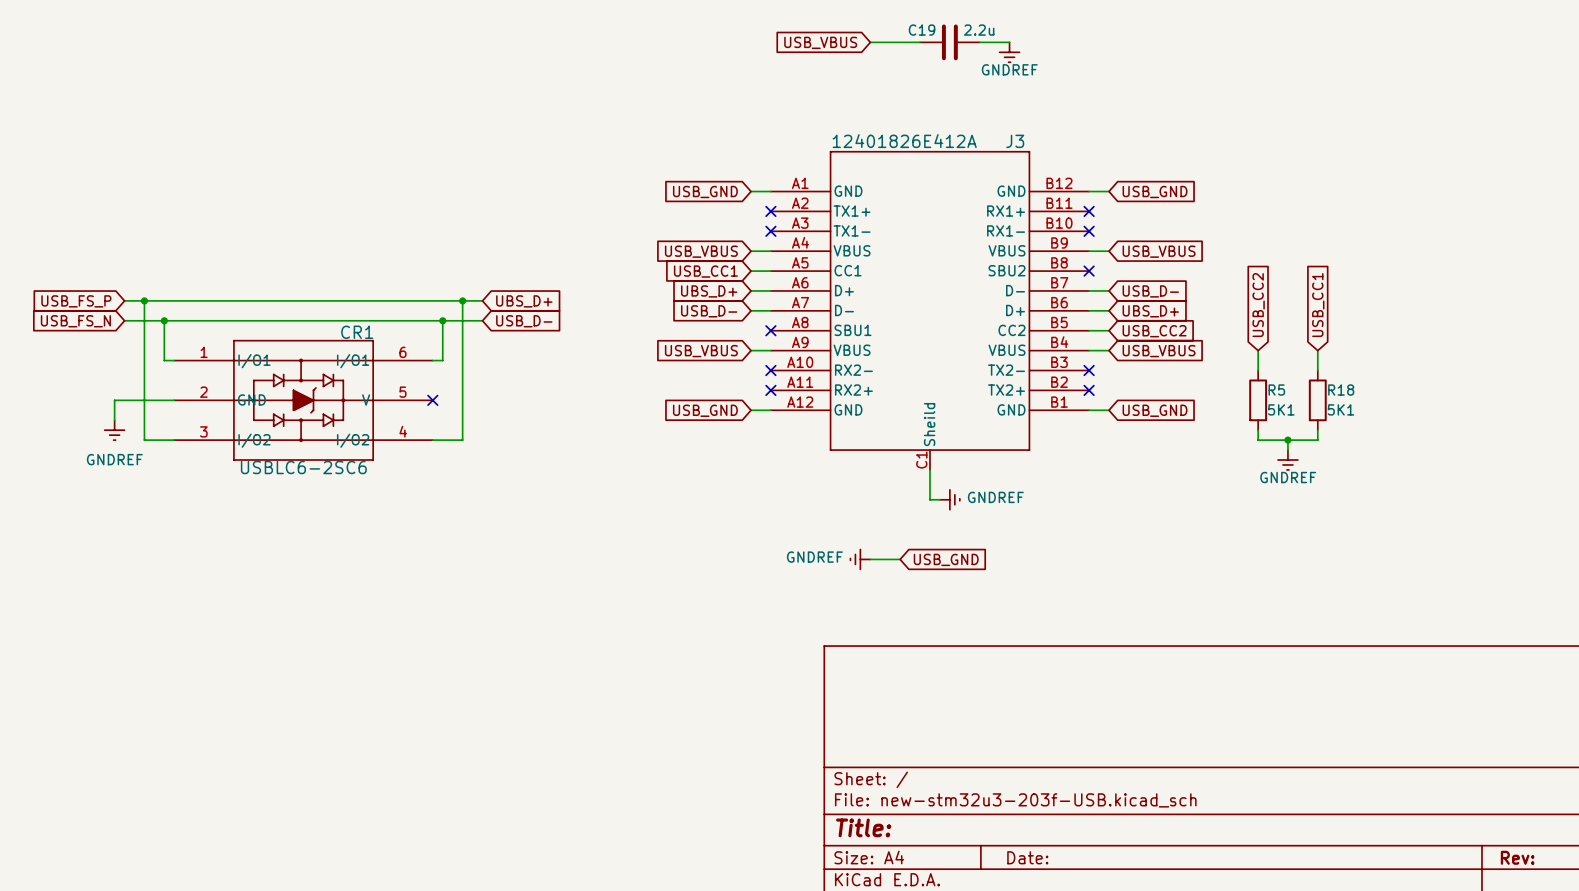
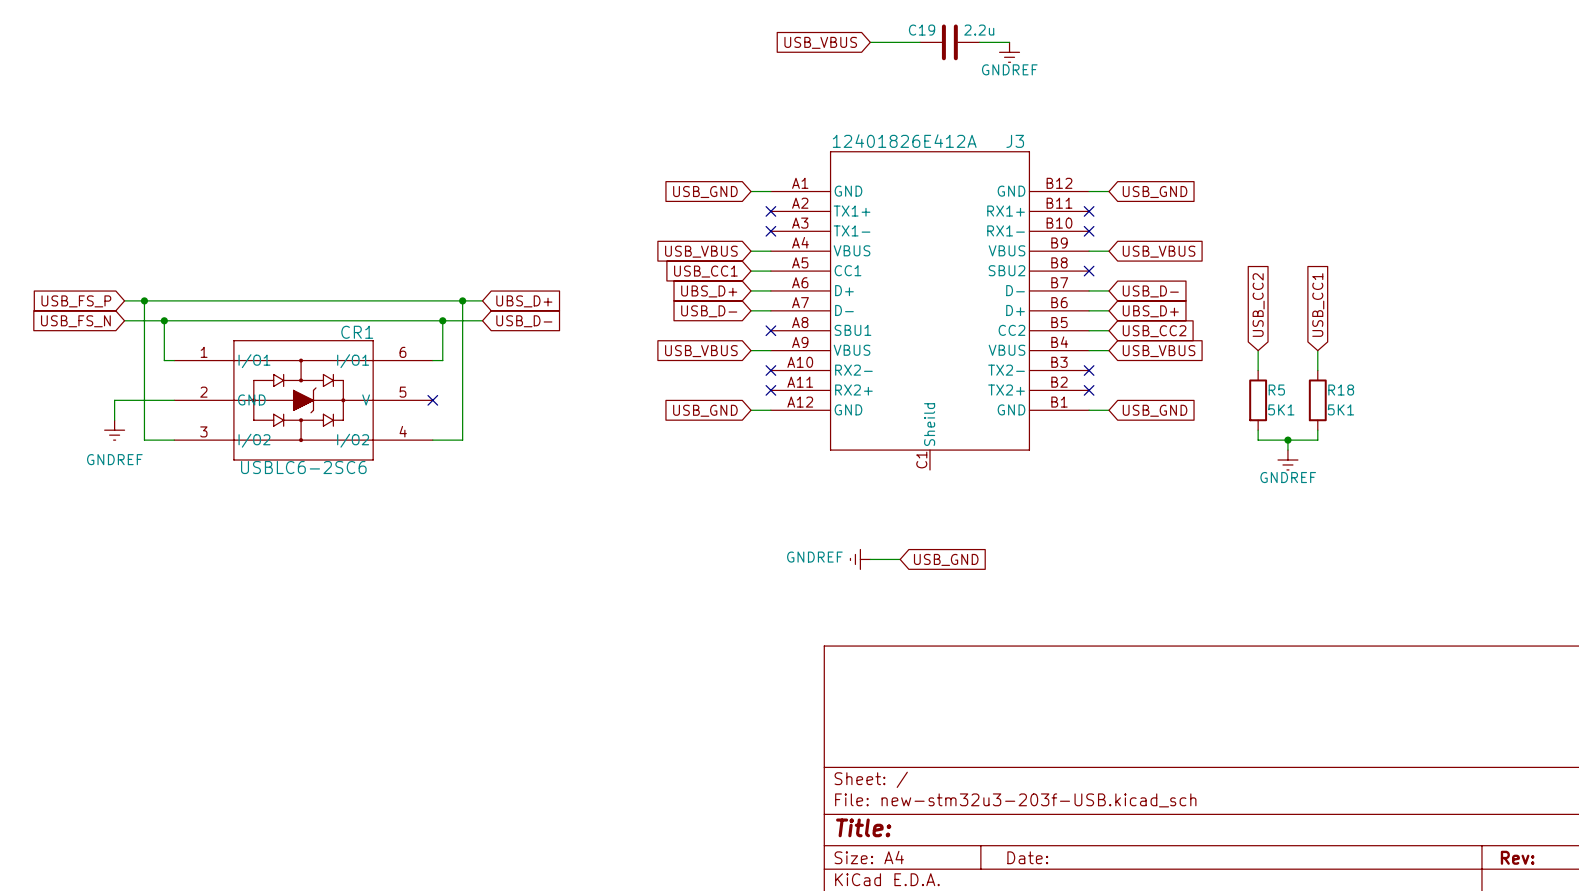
wire: (929, 469) (929, 499) (939, 499) -> none
power symbol: GNDREF (949, 499) -> none

